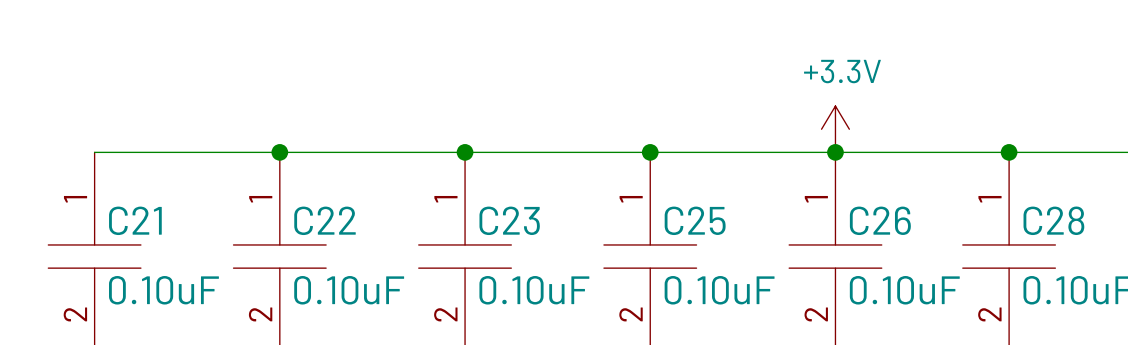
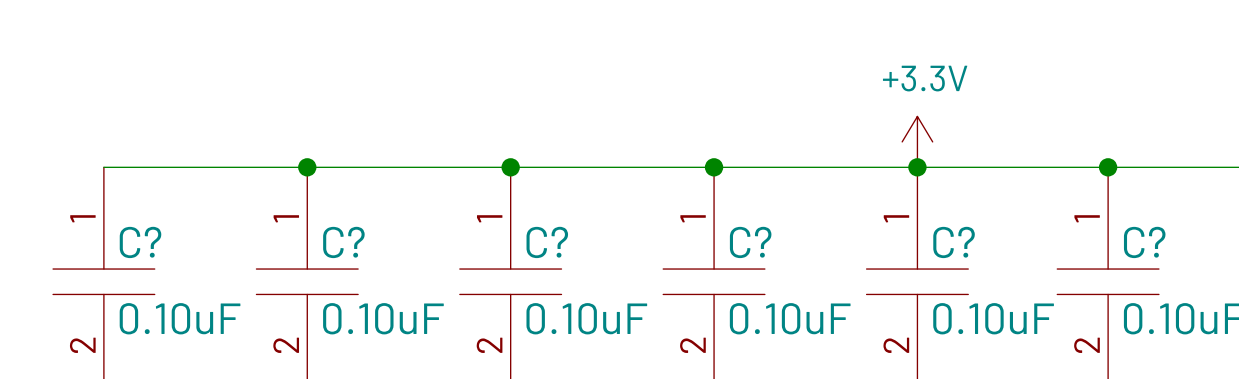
C21 name: C21 (135, 220) -> C? (140, 242)
C22 name: C22 (325, 220) -> C? (343, 242)
C23 name: C23 (509, 220) -> C? (547, 242)
C25 name: C25 (695, 220) -> C? (750, 242)
C26 name: C26 (880, 220) -> C? (954, 242)
C28 name: C28 (1053, 220) -> C? (1144, 242)

